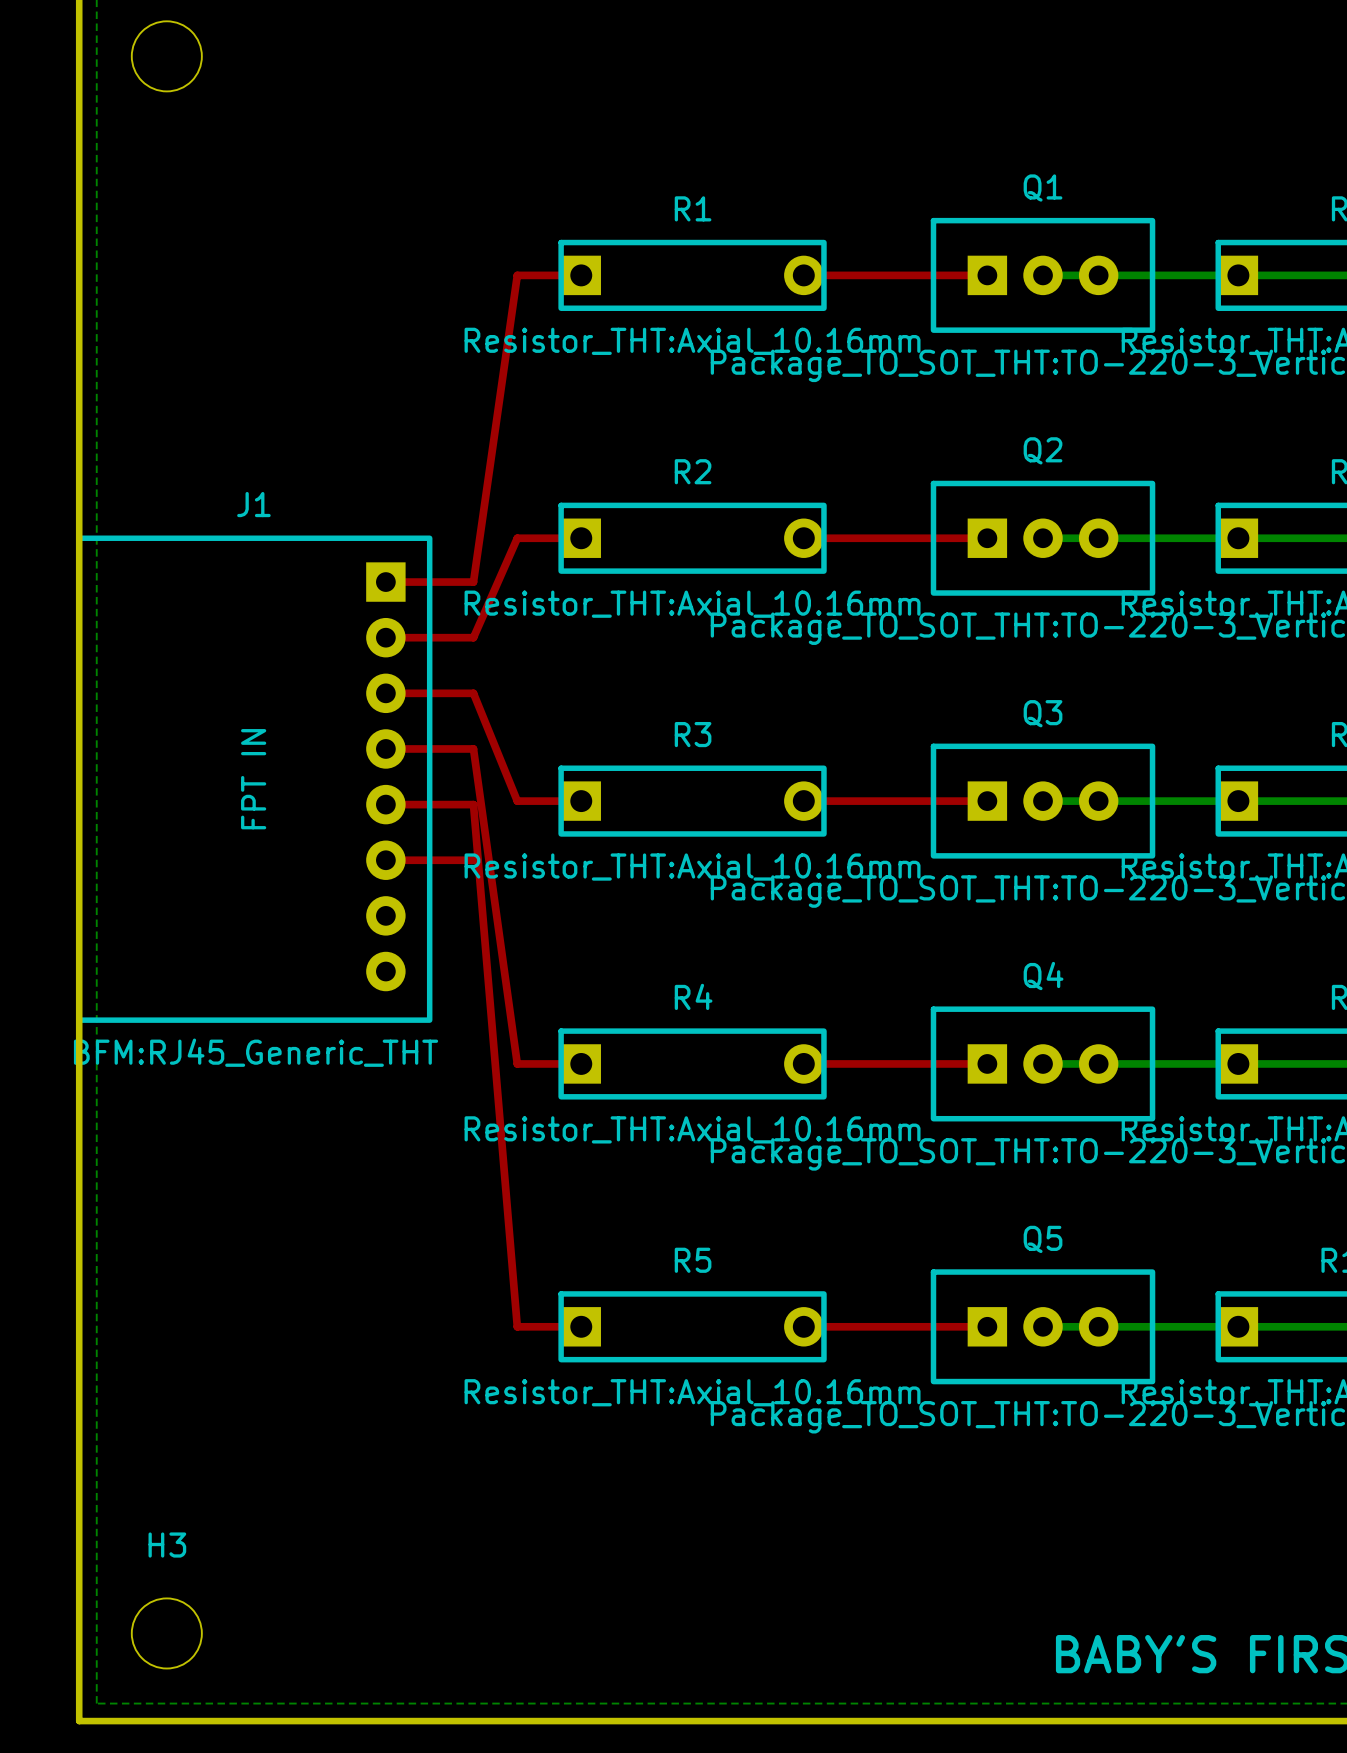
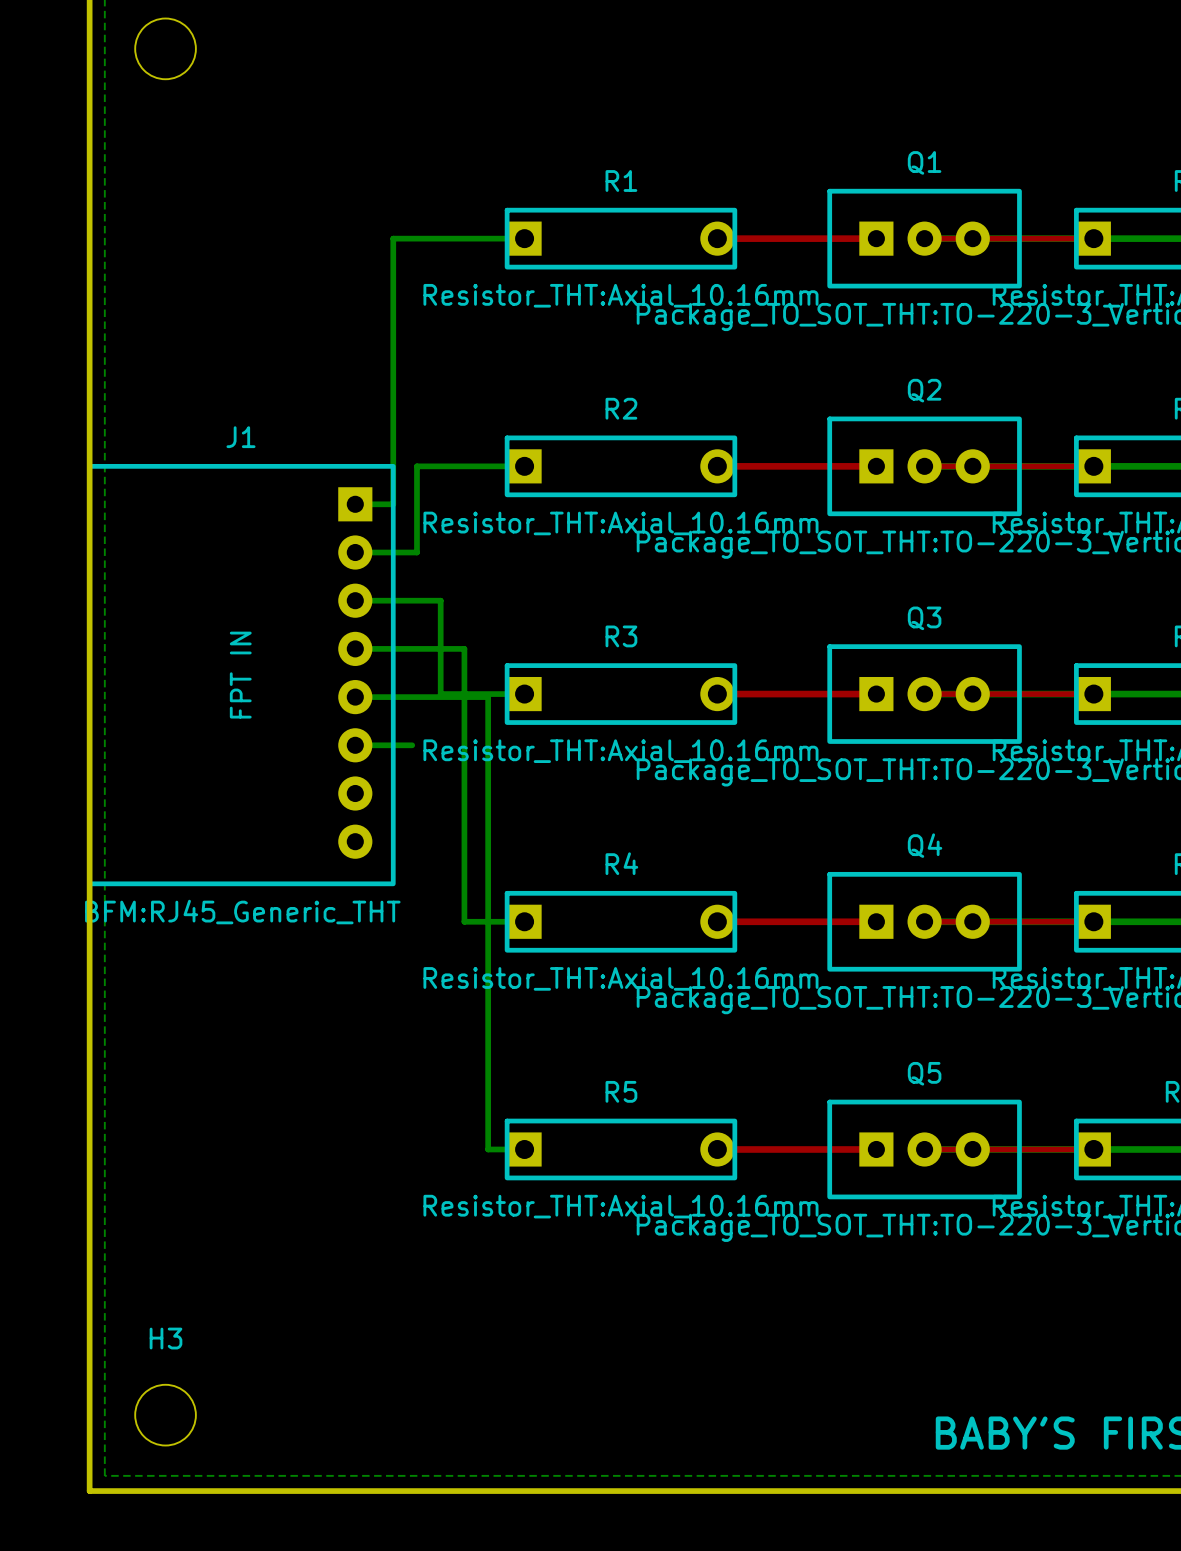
top track: (581, 275) (517, 275) (473, 582) (385, 582) -> none
bottom track: none -> (524, 238) (393, 238) (393, 504) (355, 504)
top track: none -> (924, 238) (1093, 238)
top track: (581, 538) (517, 538) (473, 637) (385, 637) -> none
bottom track: none -> (524, 466) (416, 466) (416, 552) (355, 552)
top track: none -> (924, 466) (1093, 466)
top track: (385, 693) (473, 693) (517, 801) (581, 801) -> none
bottom track: none -> (355, 600) (440, 600) (440, 694) (524, 694)
top track: (385, 748) (473, 748) (517, 1063) (581, 1063) -> none
bottom track: none -> (355, 648) (464, 648) (464, 921) (524, 921)
top track: none -> (924, 694) (1093, 694)
top track: (385, 804) (473, 804) (517, 1326) (581, 1326) -> none
bottom track: none -> (355, 697) (488, 697) (488, 1149) (524, 1149)
top track: (385, 860) (473, 860) -> none
bottom track: none -> (355, 745) (412, 745)
top track: none -> (924, 921) (1093, 921)
top track: none -> (924, 1149) (1093, 1149)

